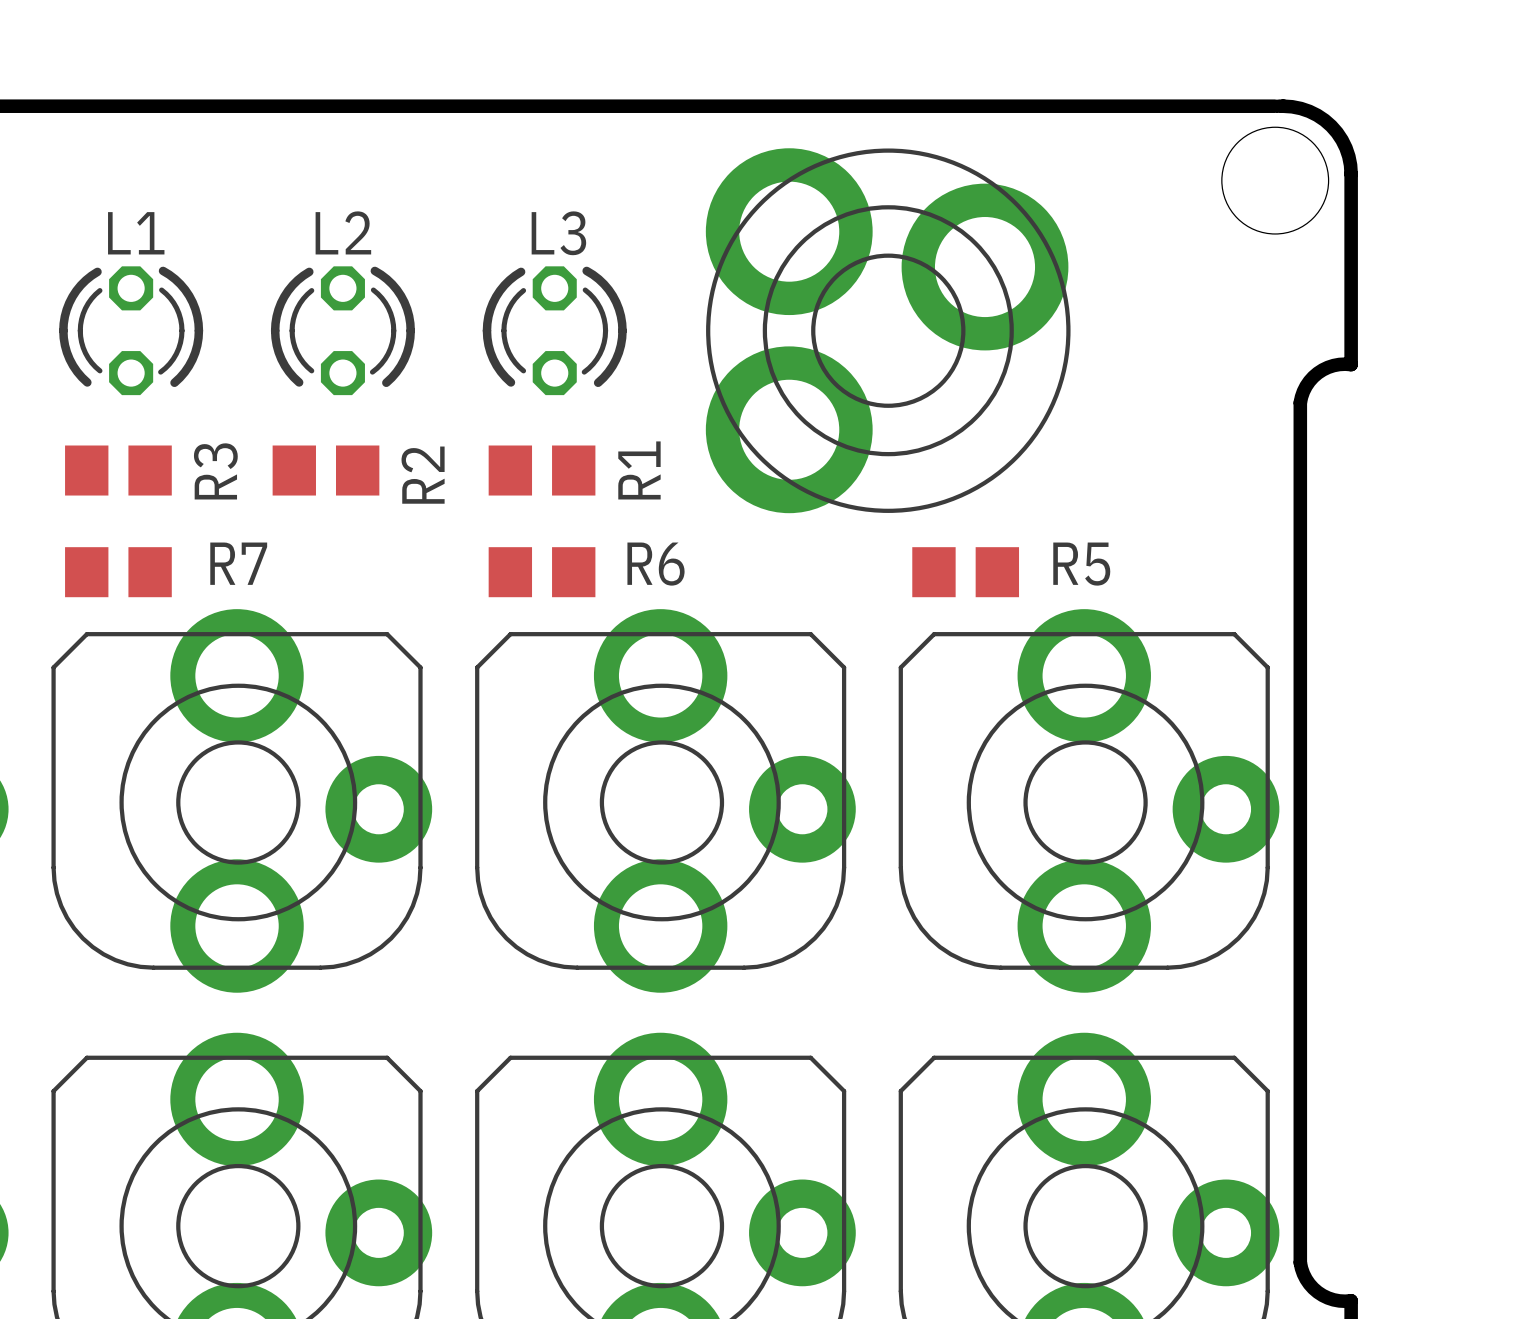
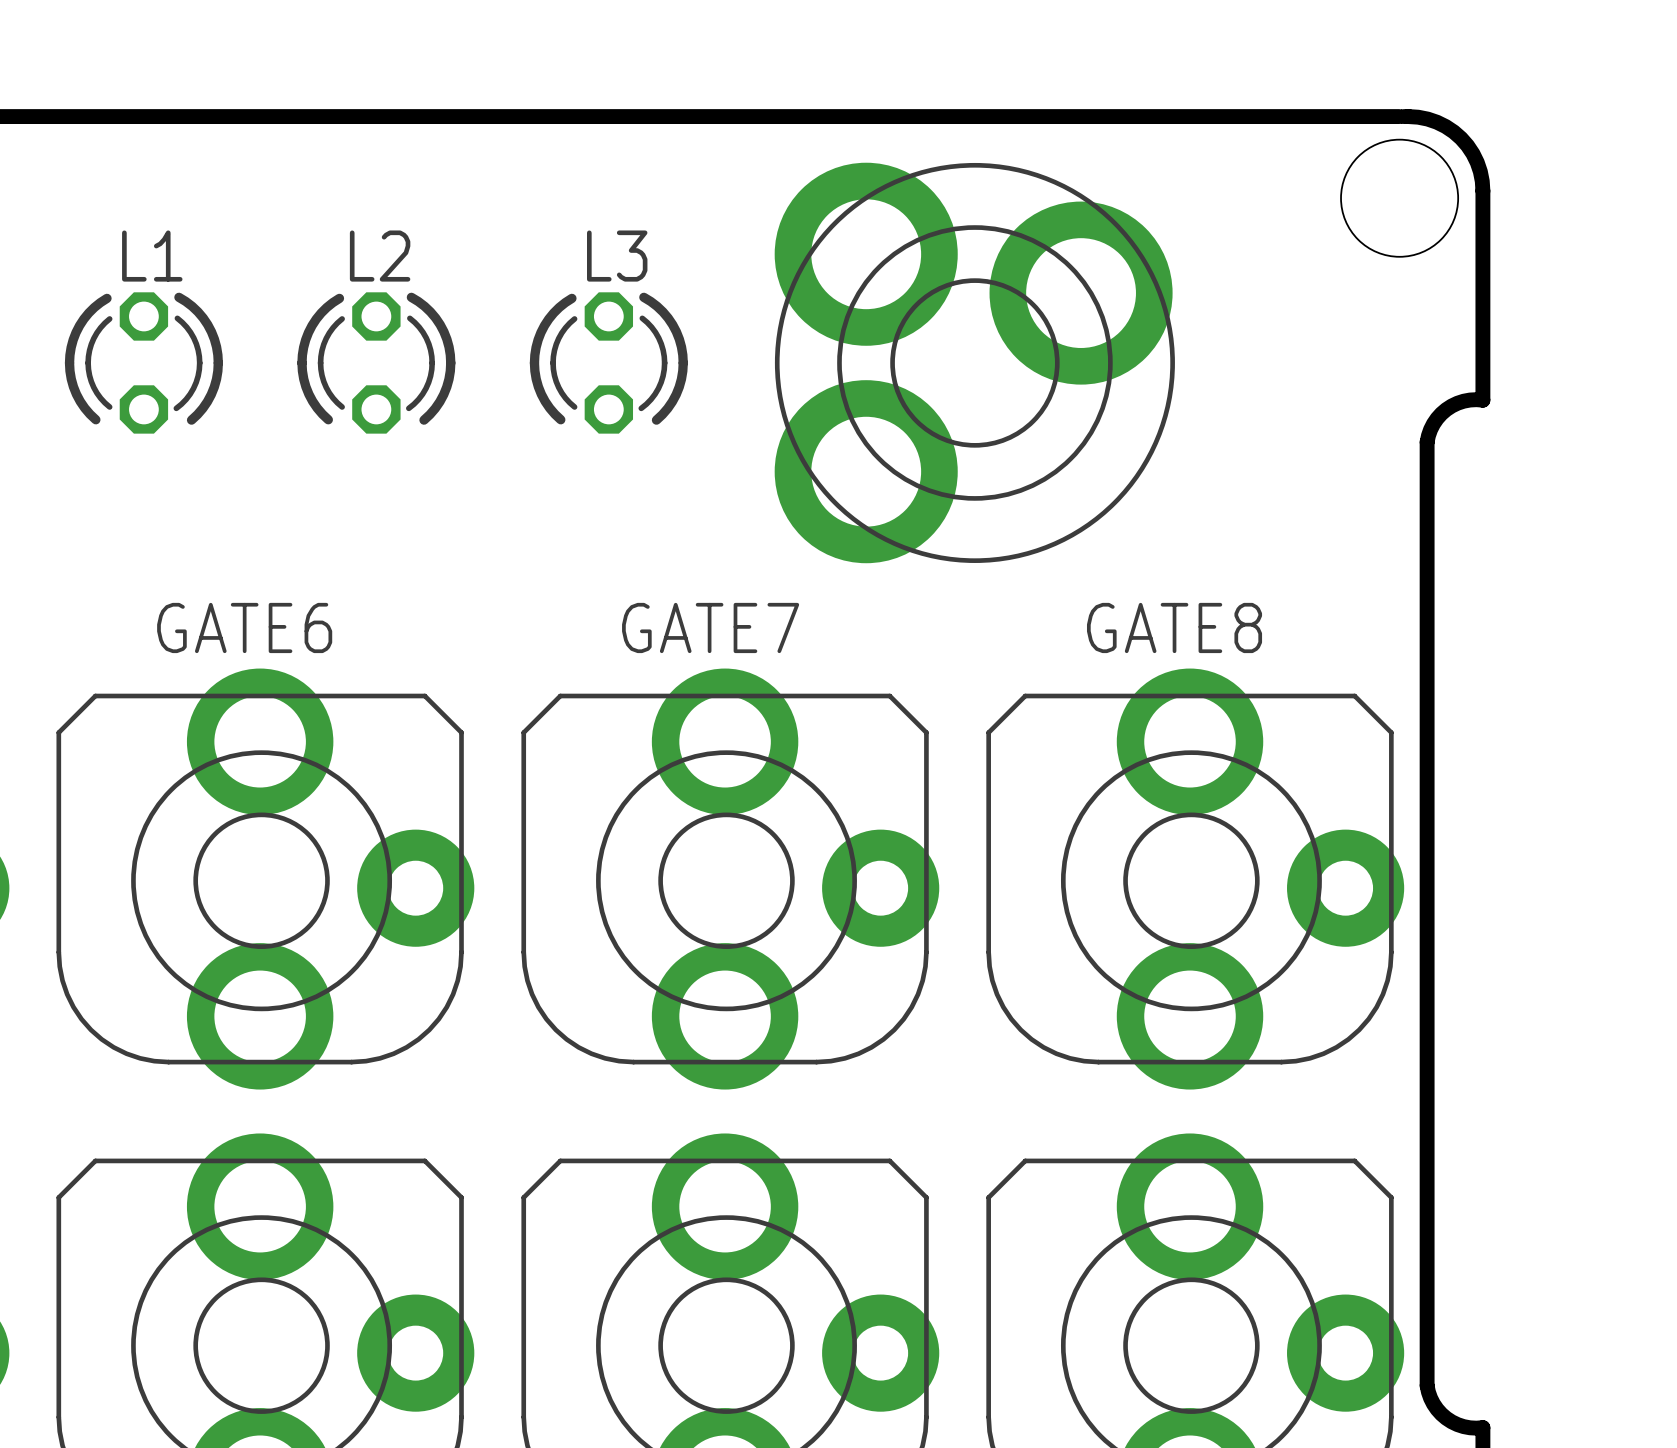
R3: (118, 470) -> none
R2: (325, 470) -> none
R1: (542, 470) -> none
R7: (118, 572) -> none
GATE6 name: none -> GATE6 (244, 627)
R6: (542, 572) -> none
GATE7 name: none -> GATE7 (710, 627)
R5: (965, 572) -> none
GATE8 name: none -> GATE8 (1174, 627)

